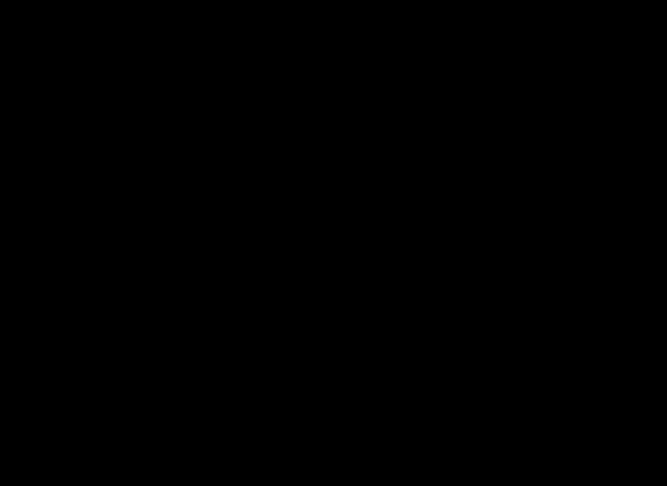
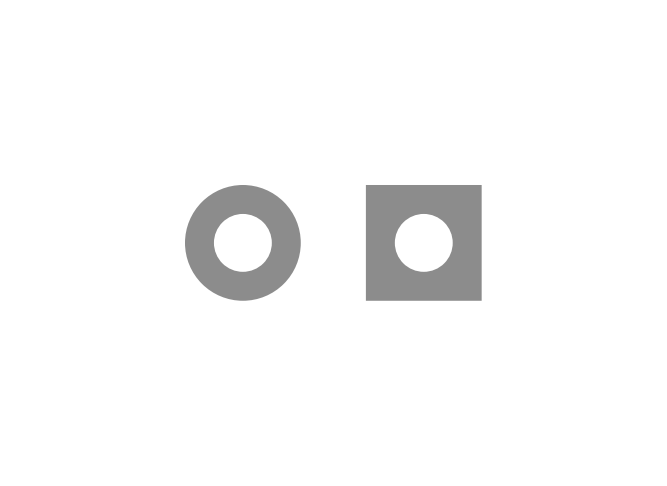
part: none -> (333, 242)

